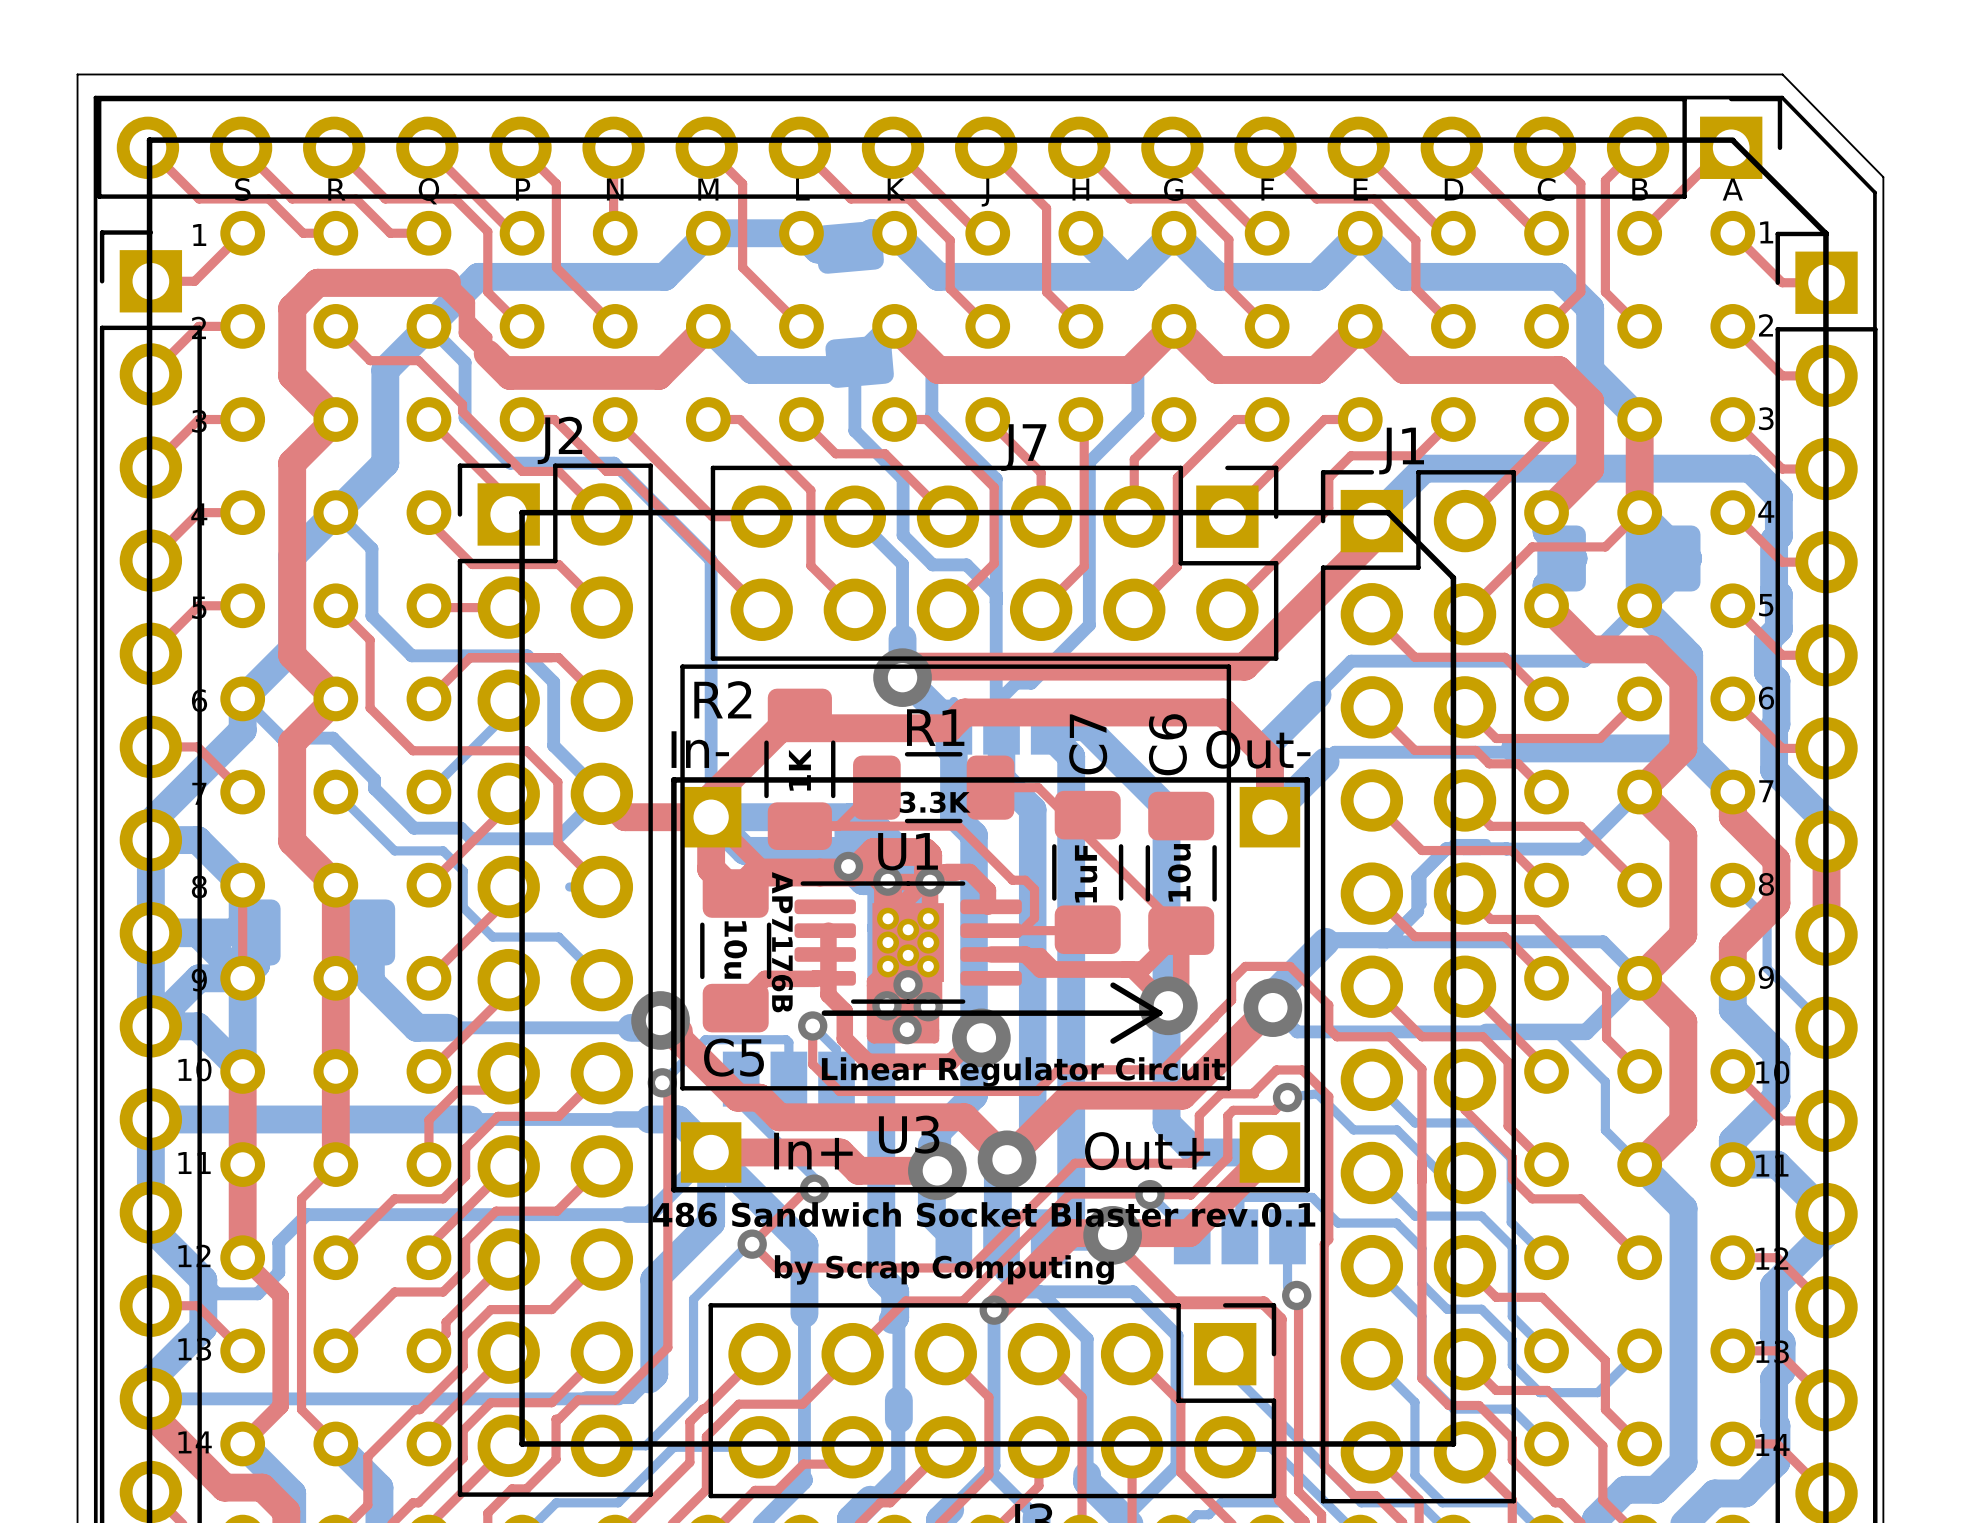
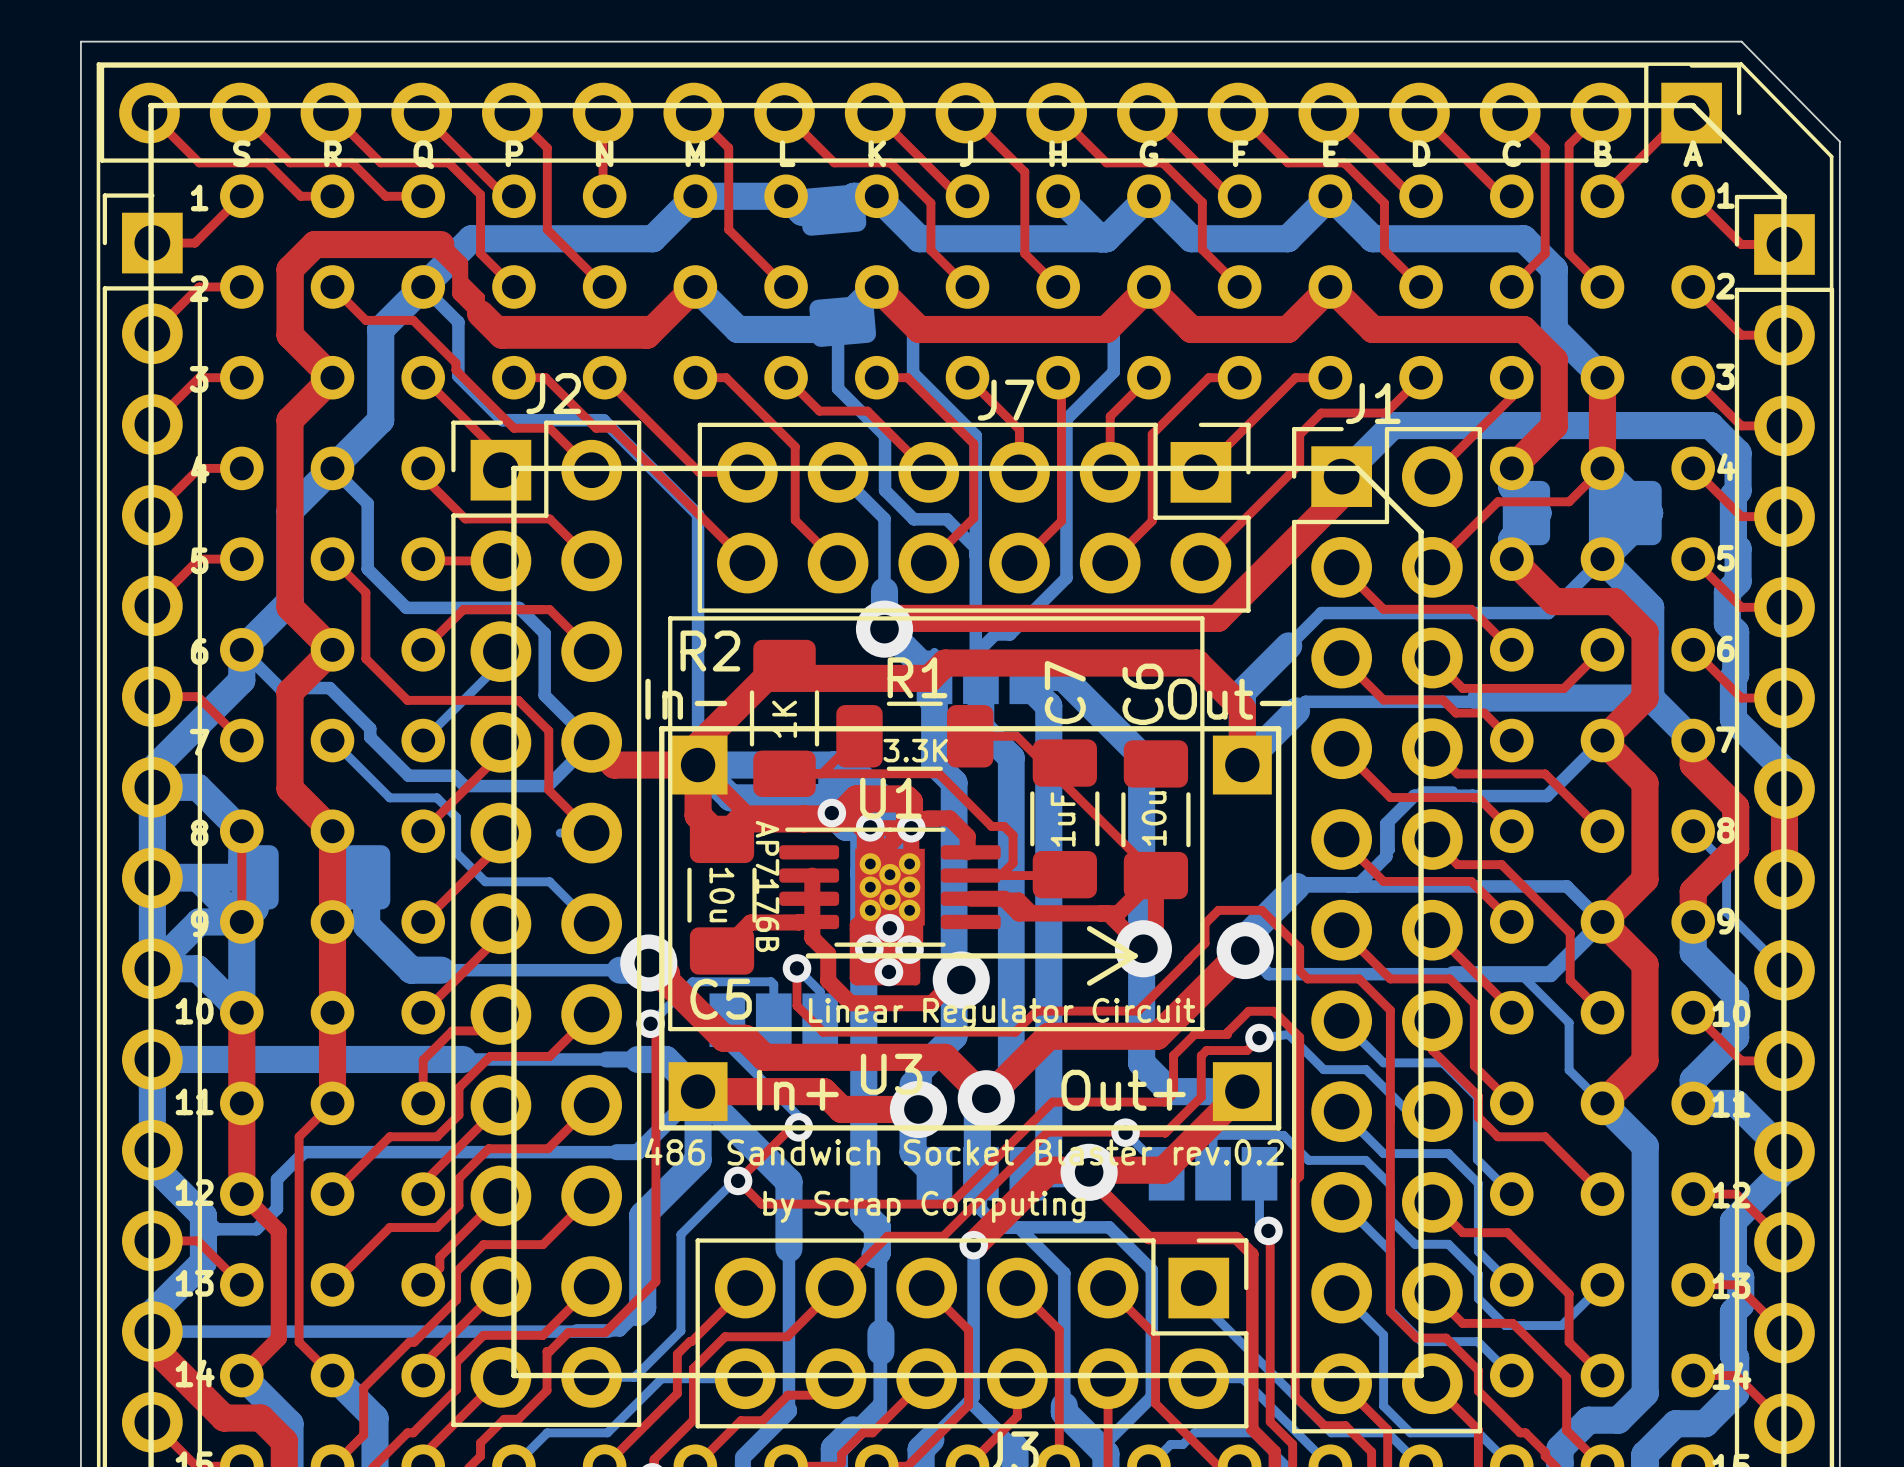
text: 486 Sandwich Socket Blaster rev.0.1 (984, 1214) -> 486 Sandwich Socket Blaster rev.0.2 (964, 1151)

